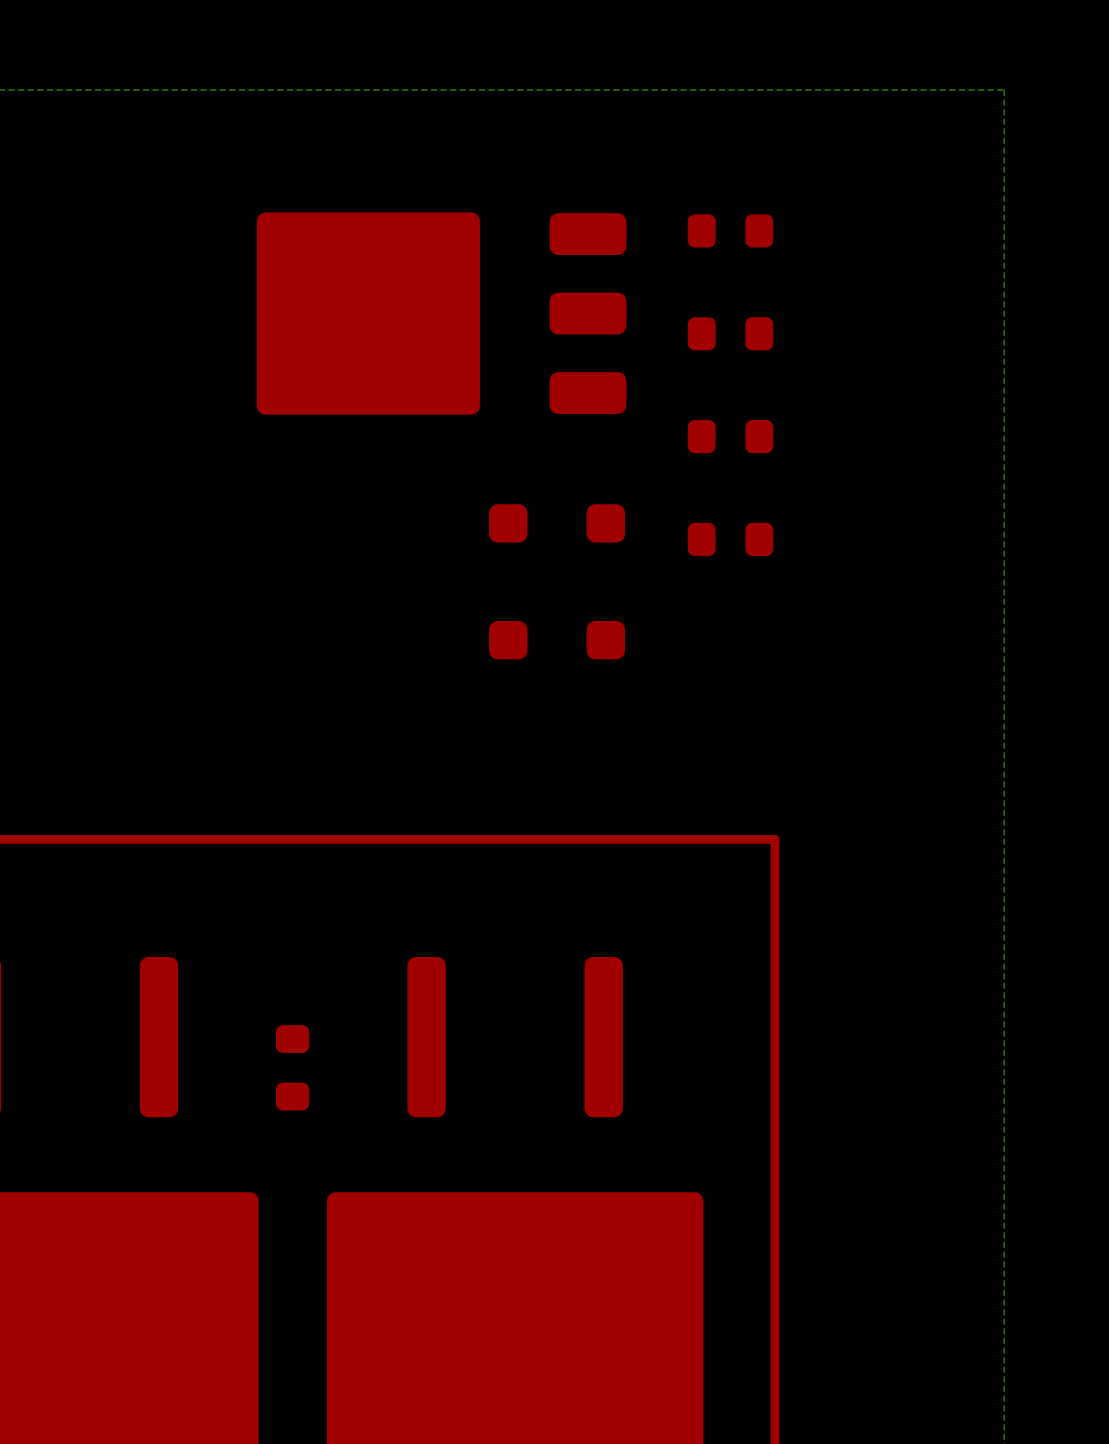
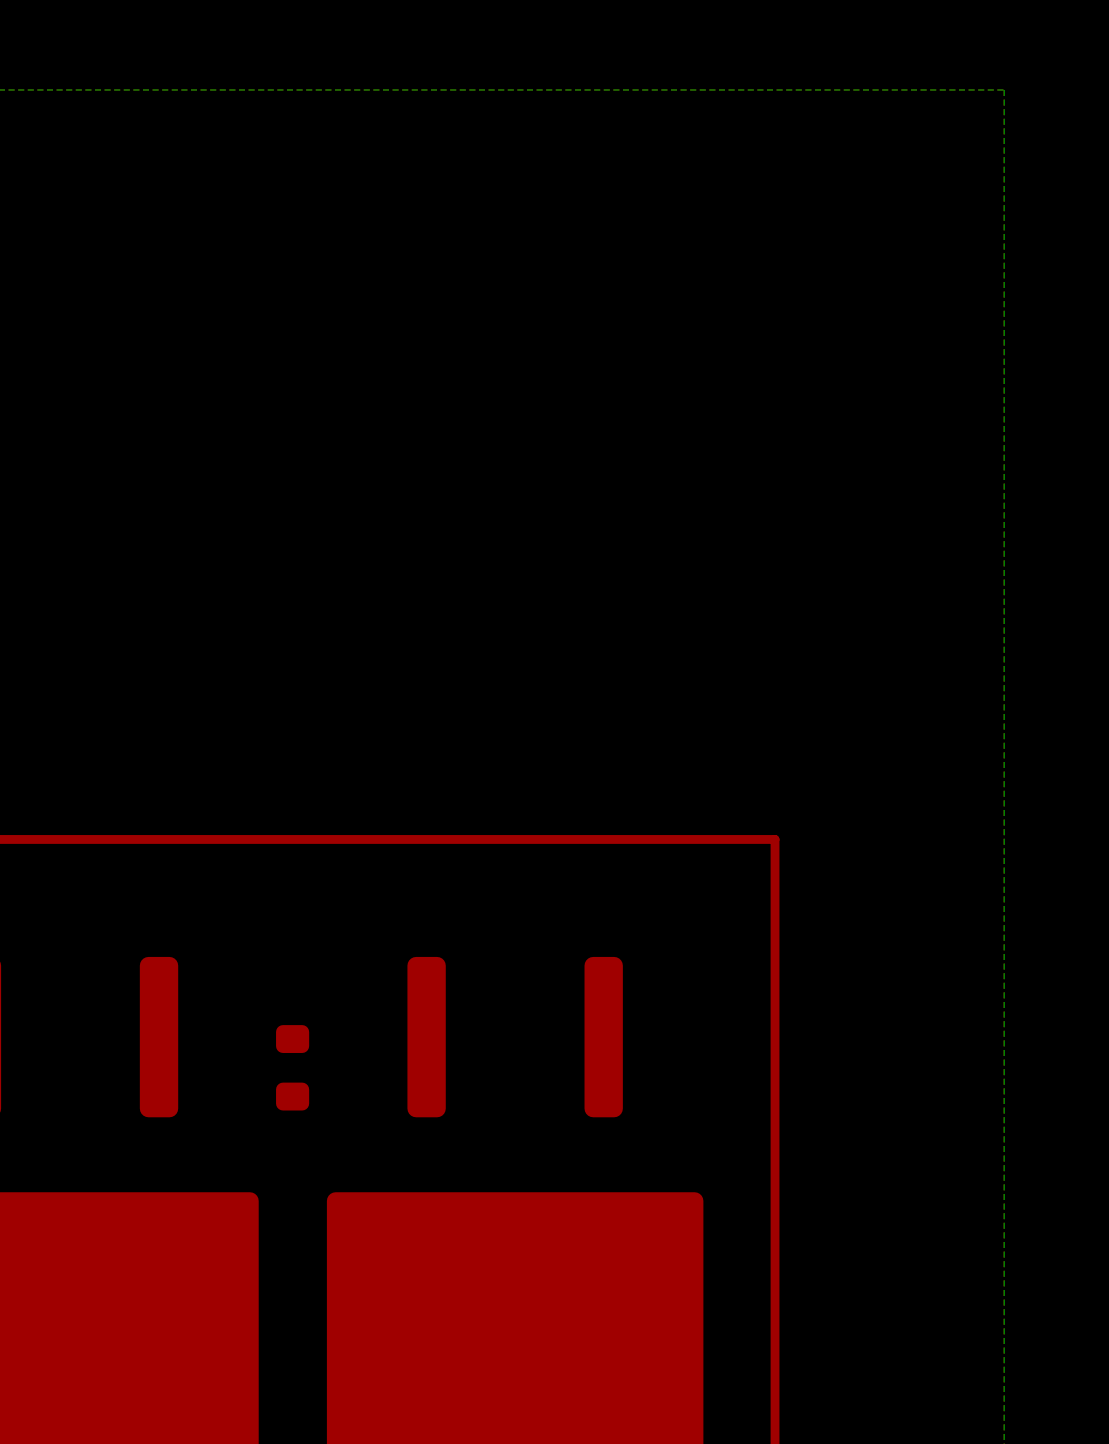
part: (730, 230) -> none
part: (441, 313) -> none
part: (730, 333) -> none
part: (730, 436) -> none
part: (557, 523) -> none
part: (730, 539) -> none
part: (557, 640) -> none

